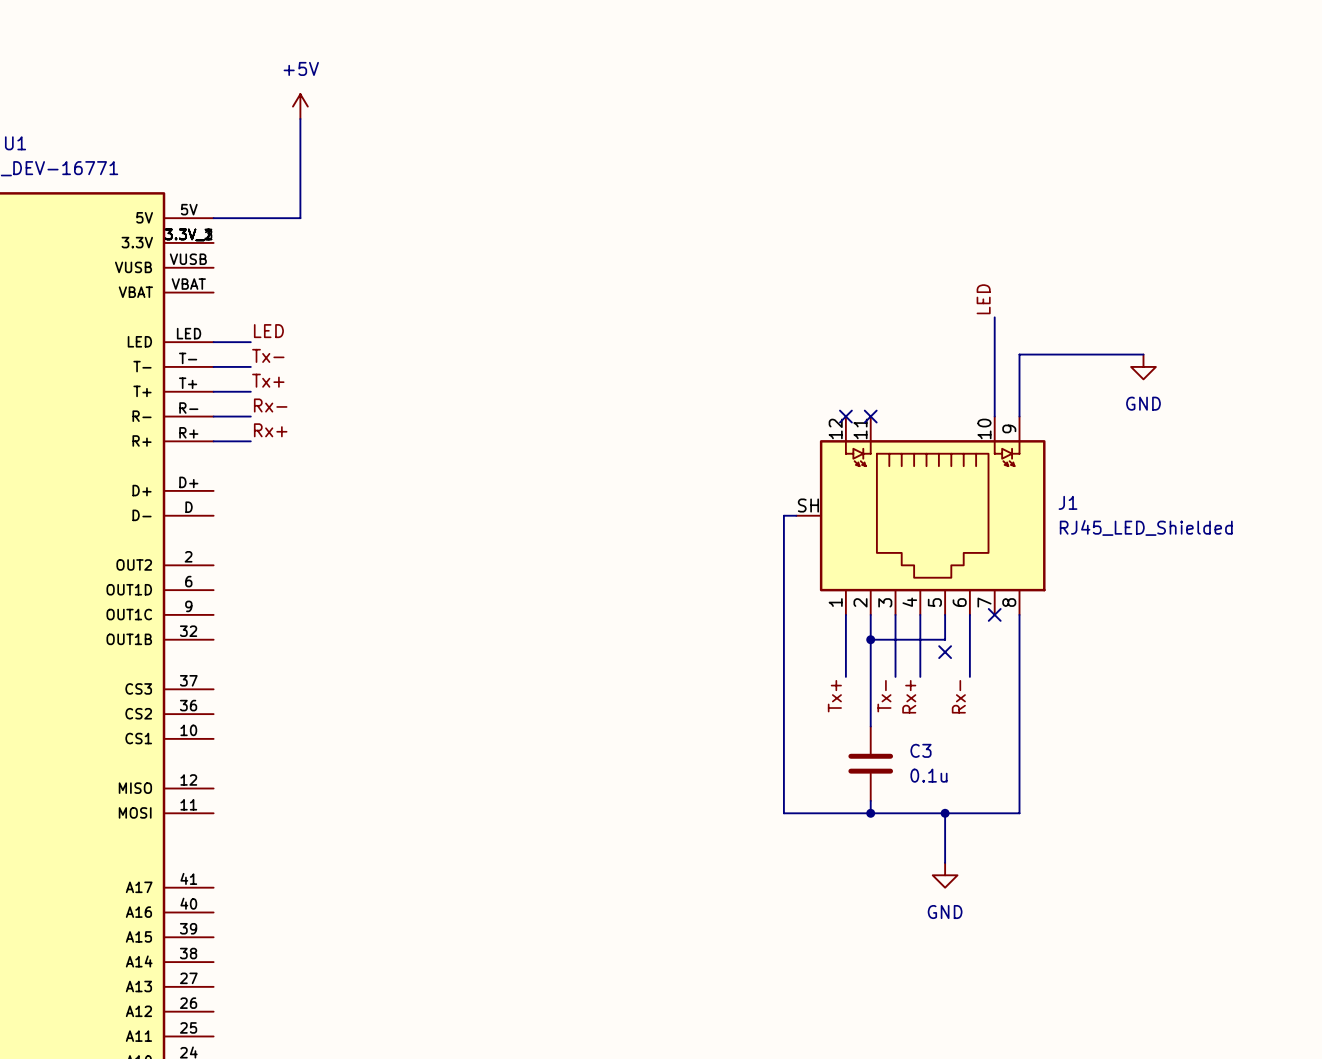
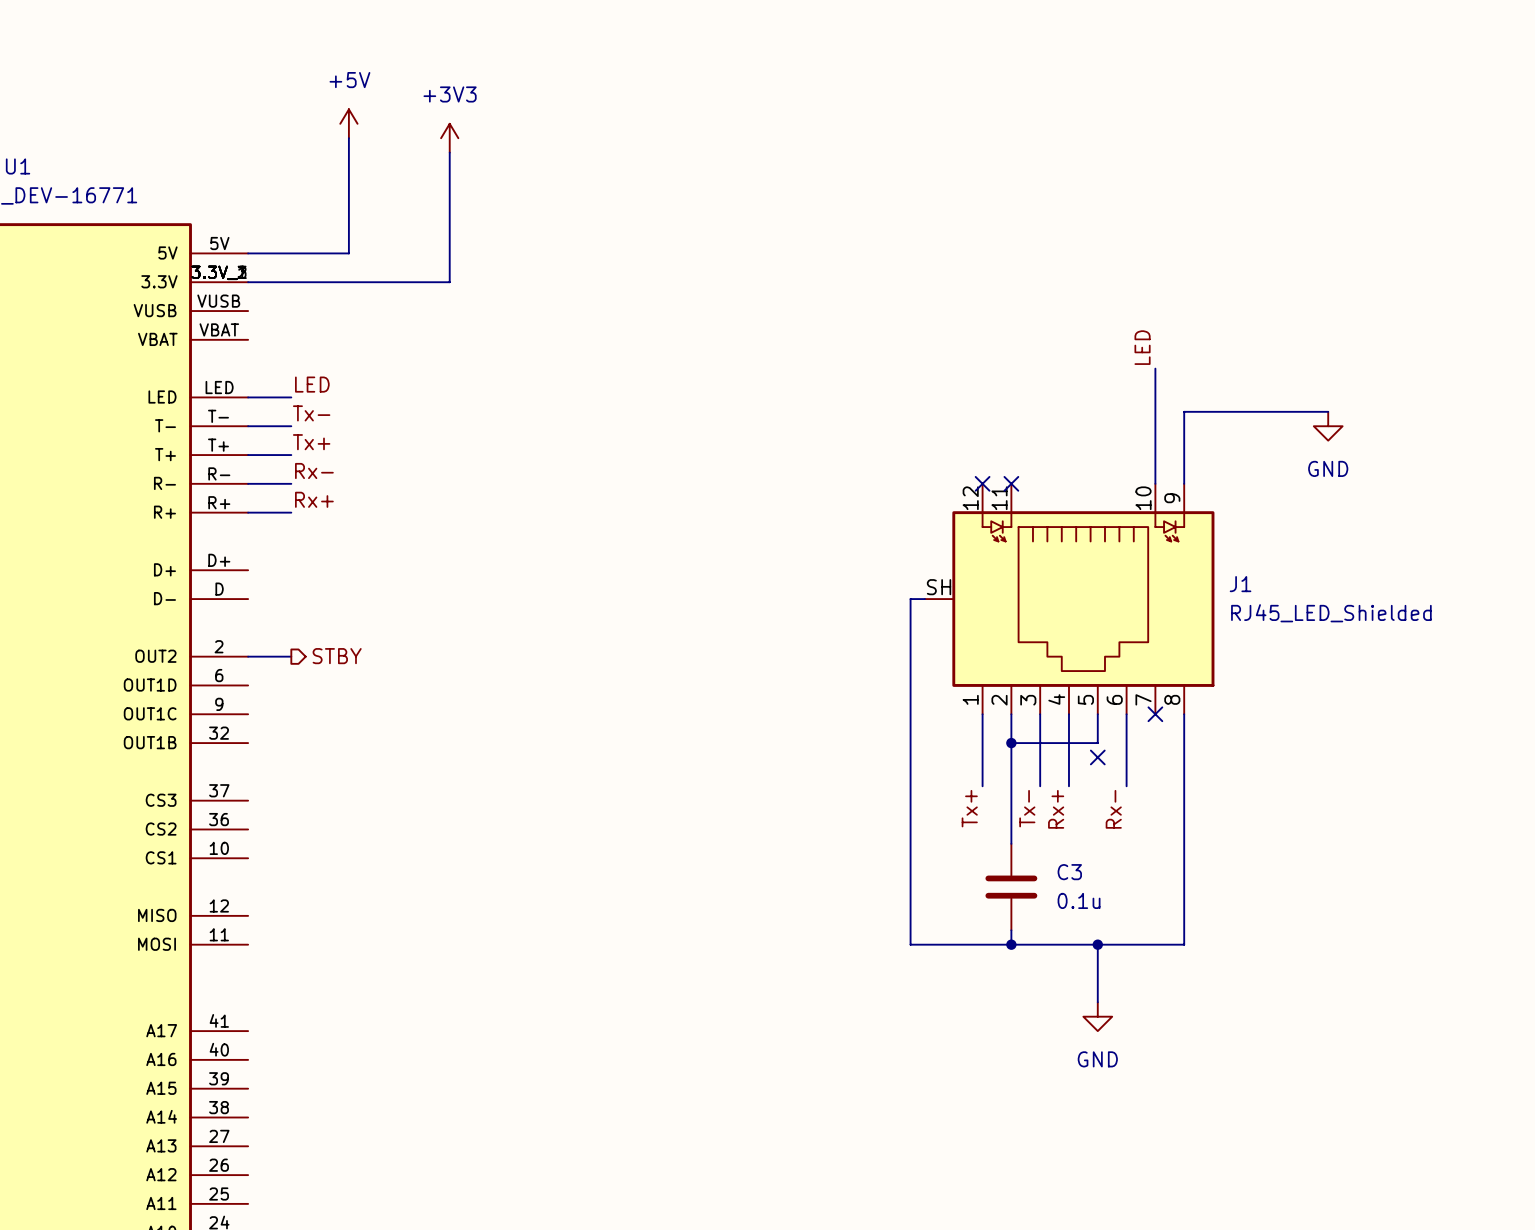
power symbol: none -> +3V3 (449, 138)
wire: none -> (449, 152) (449, 282) (248, 282)
hierarchical label: none -> STBY (337, 656)
wire: none -> (248, 656) (291, 656)

